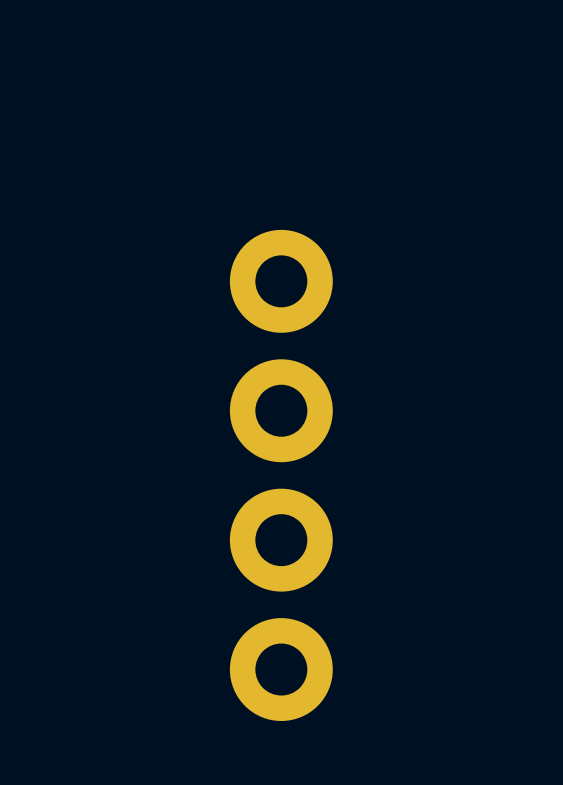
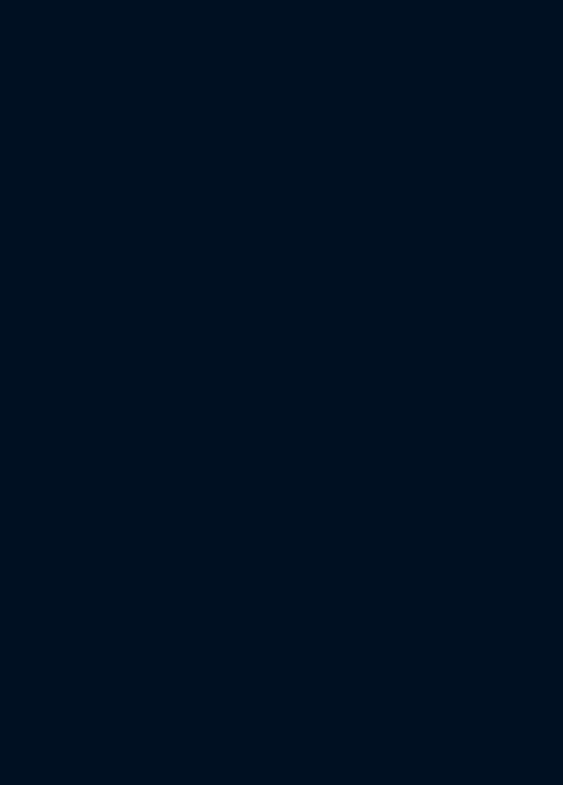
part: (281, 475) -> none

